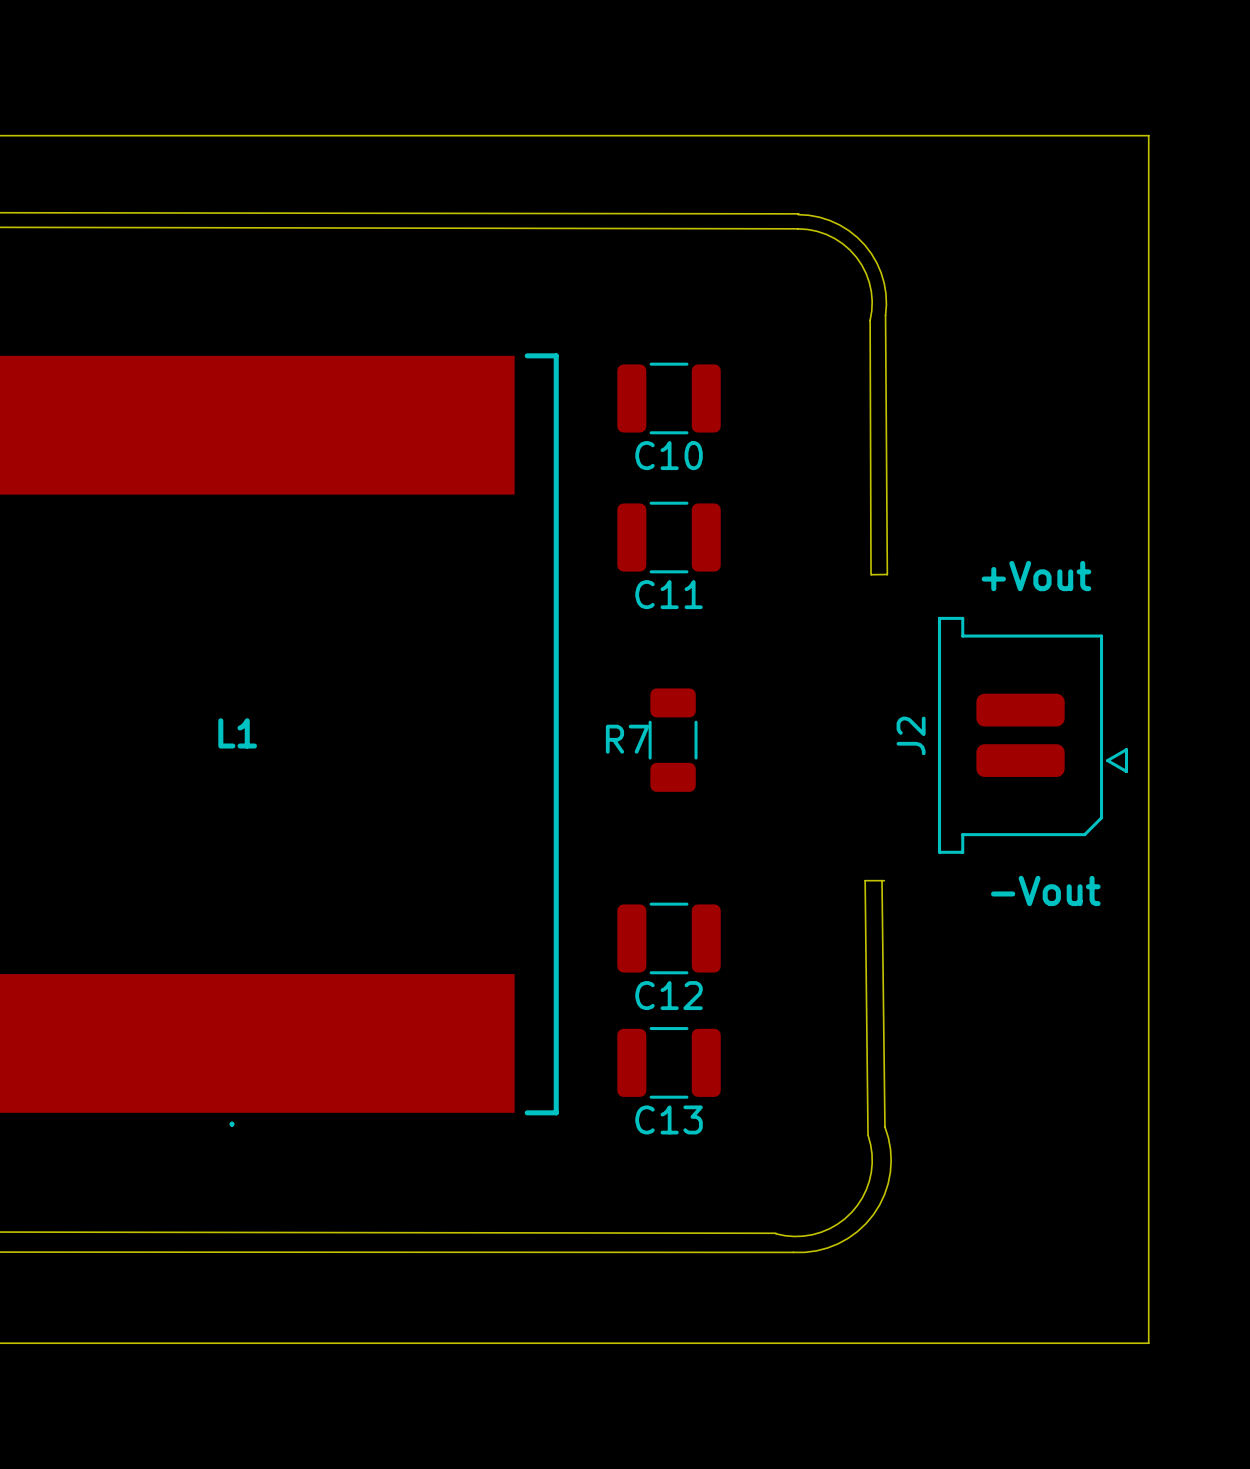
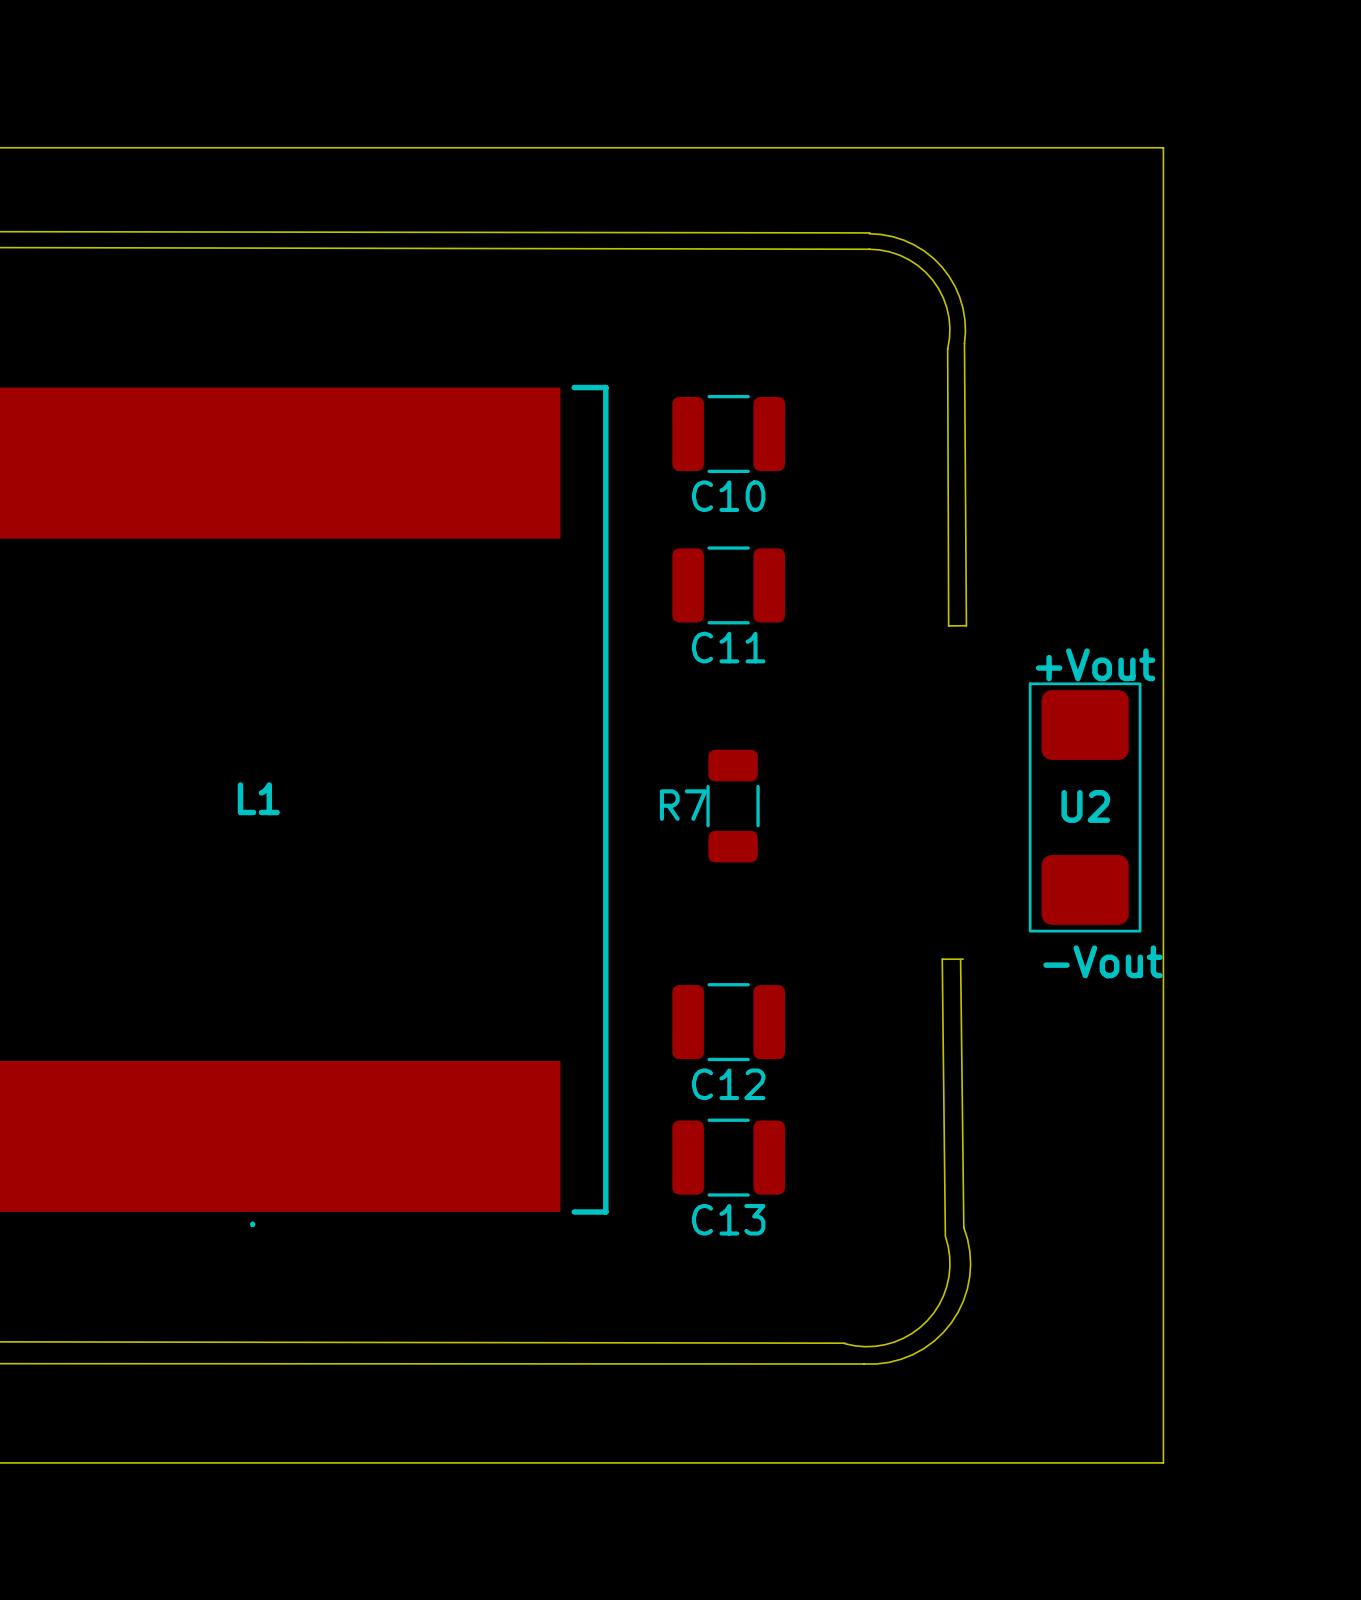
board edge: (1068, 135) (1148, 135) (1148, 1343) (1068, 1343) -> (1163, 147) (1163, 1462)
text position: +Vout (1036, 576) -> +Vout (1095, 664)
J2: (1033, 735) -> none
U2: none -> (1085, 807)
text position: -Vout (1045, 890) -> -Vout (1102, 961)

